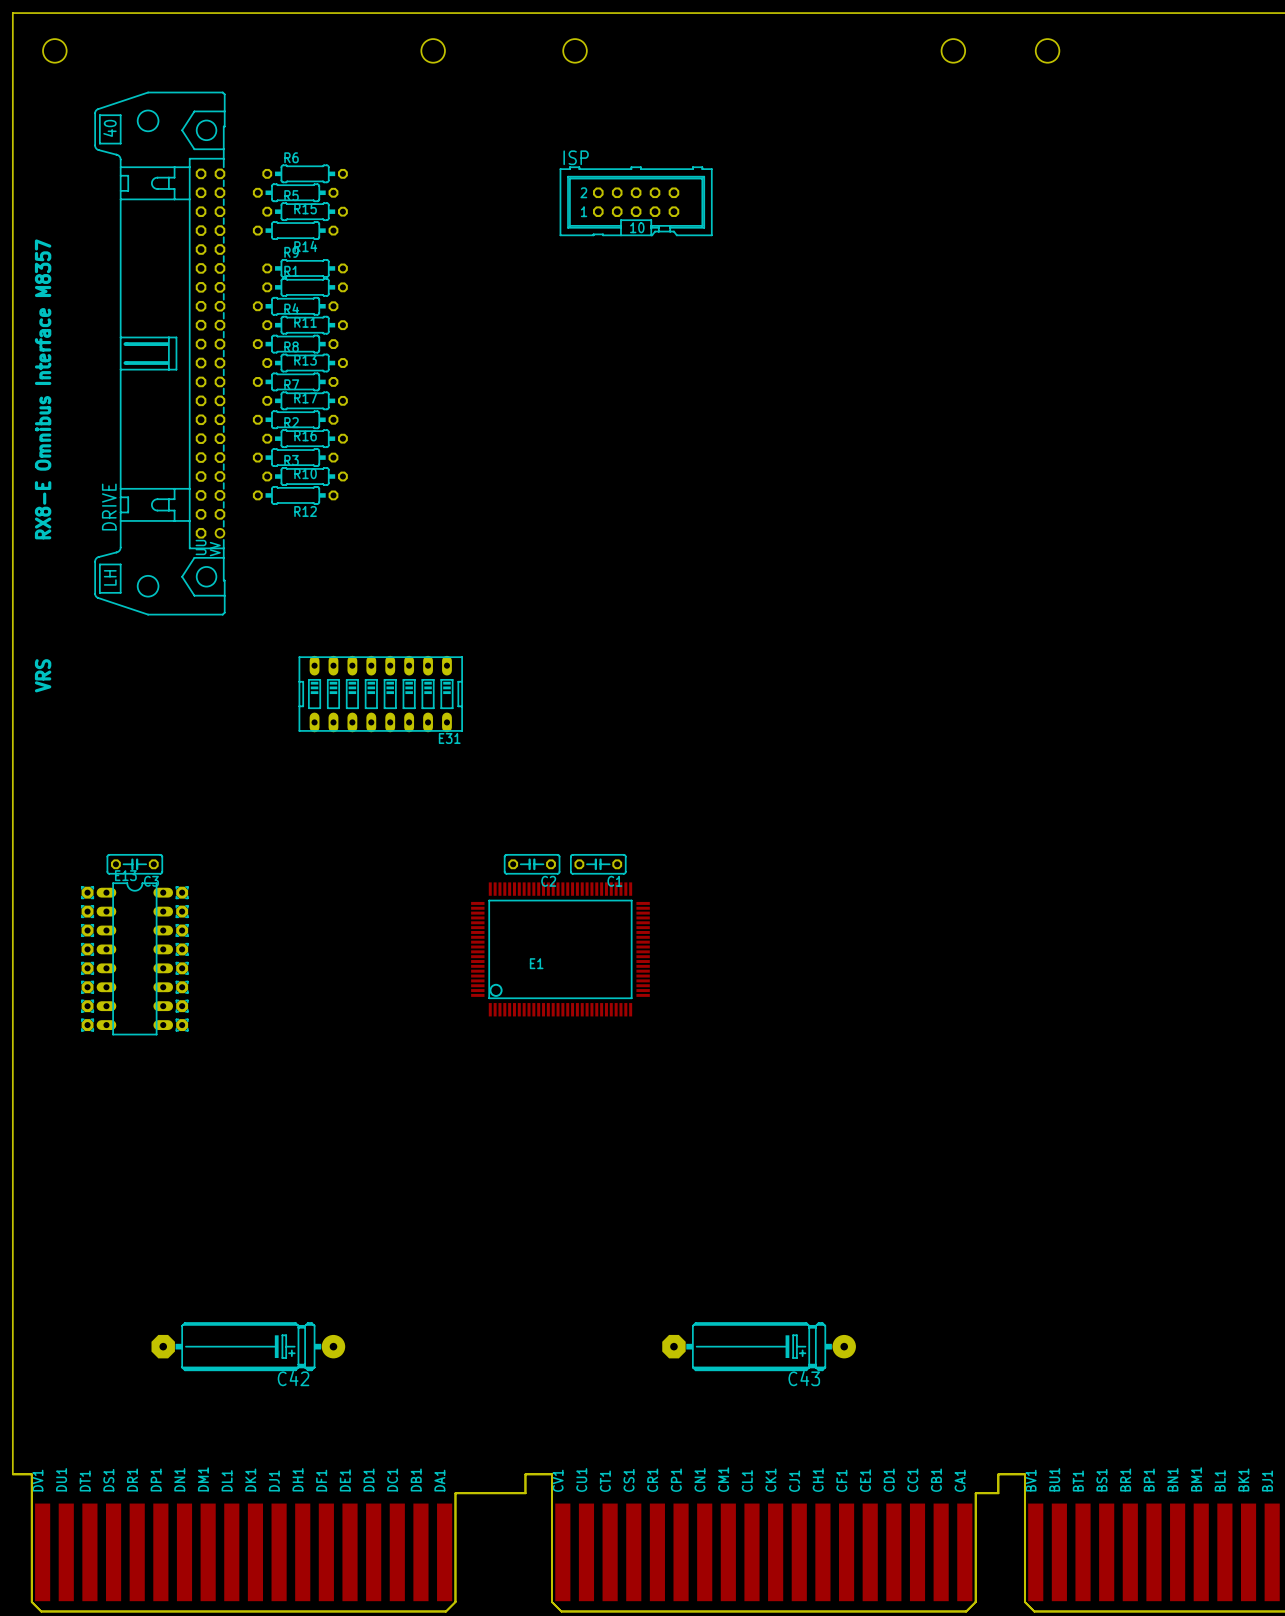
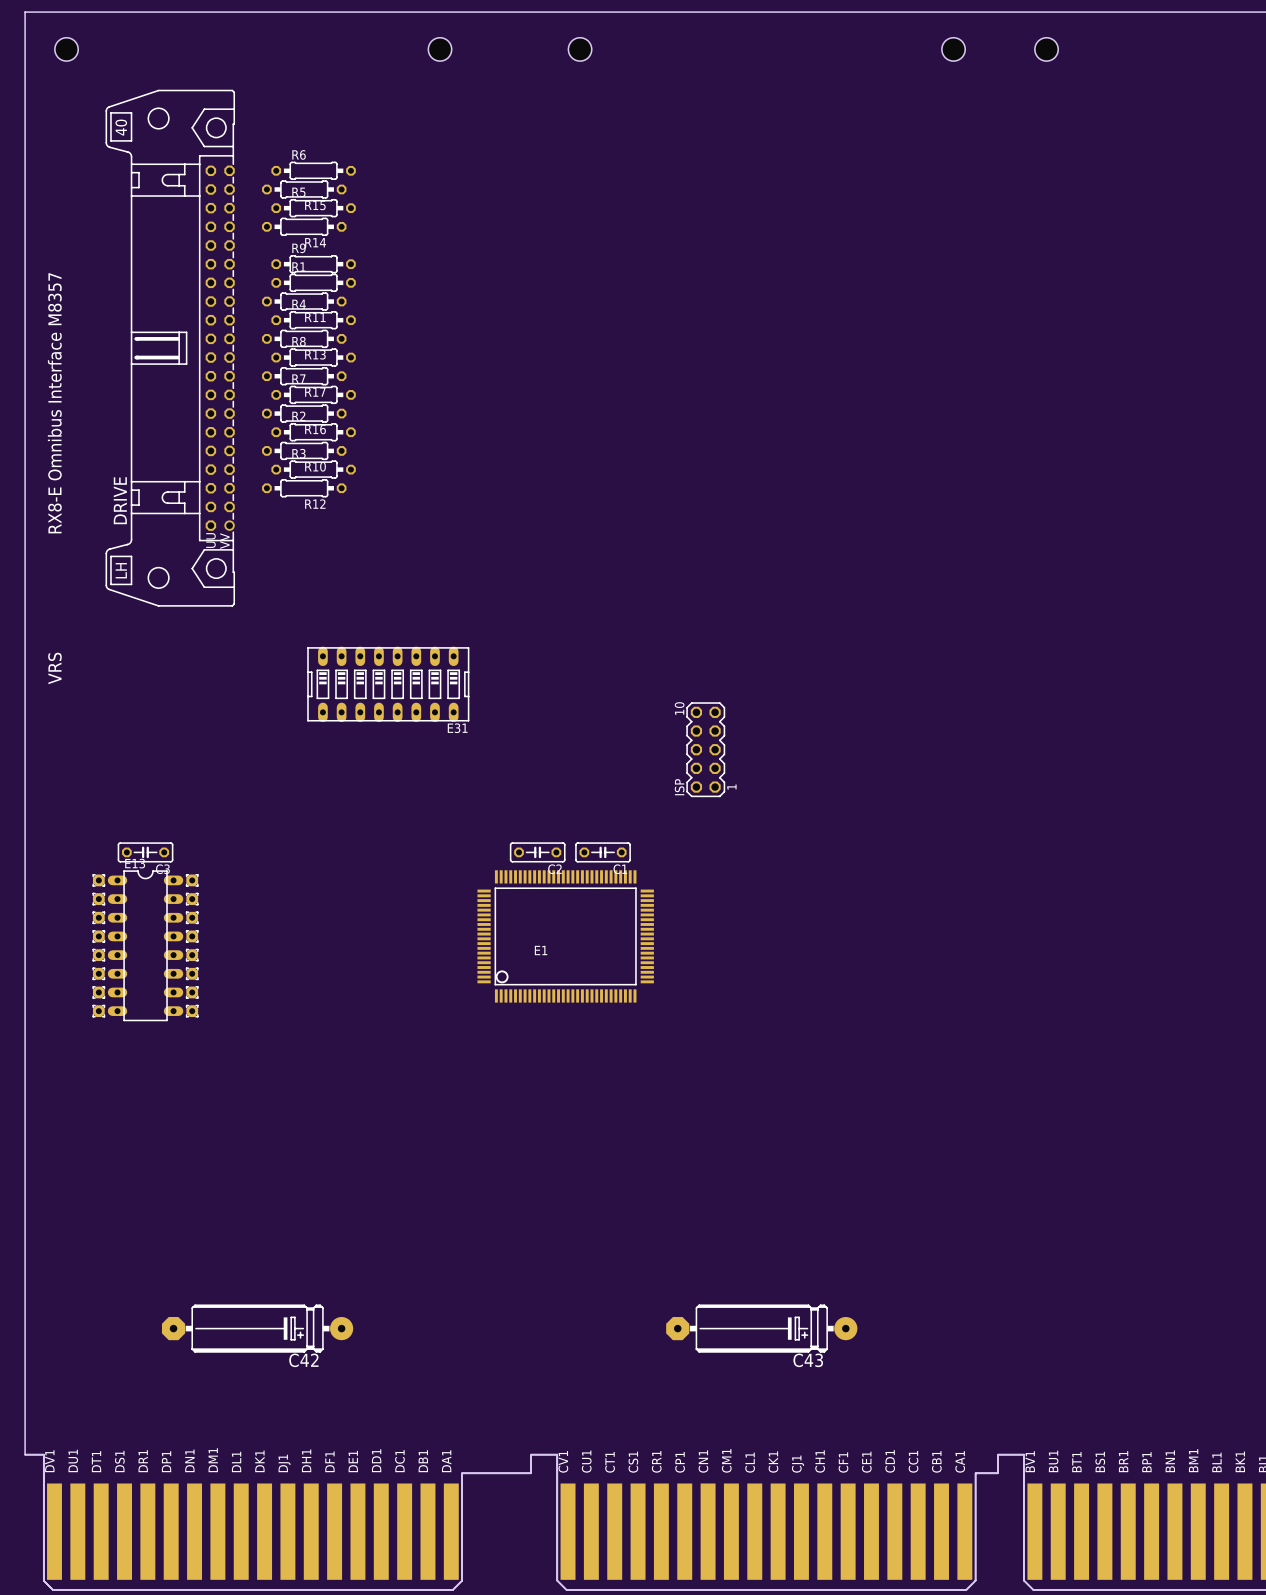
ISP: (636, 201) -> none
ISP: none -> (705, 749)

